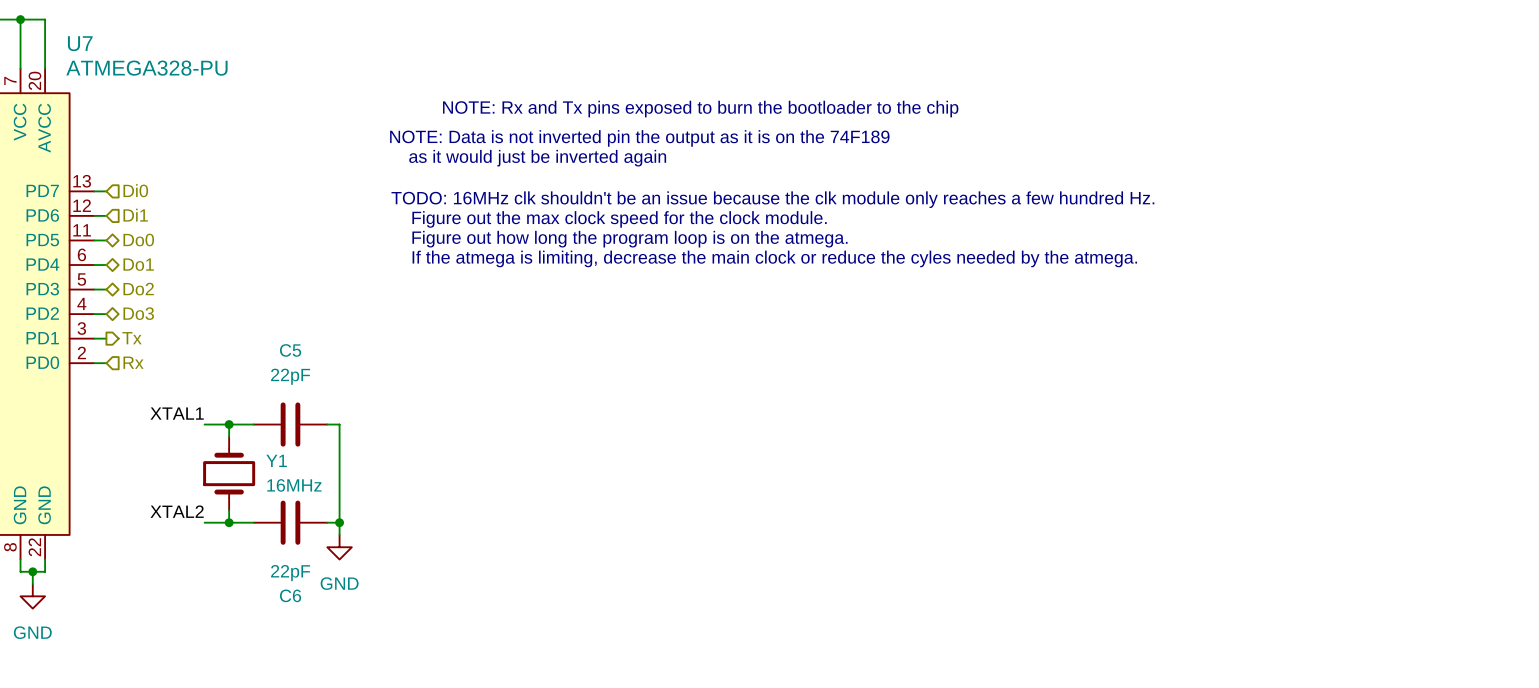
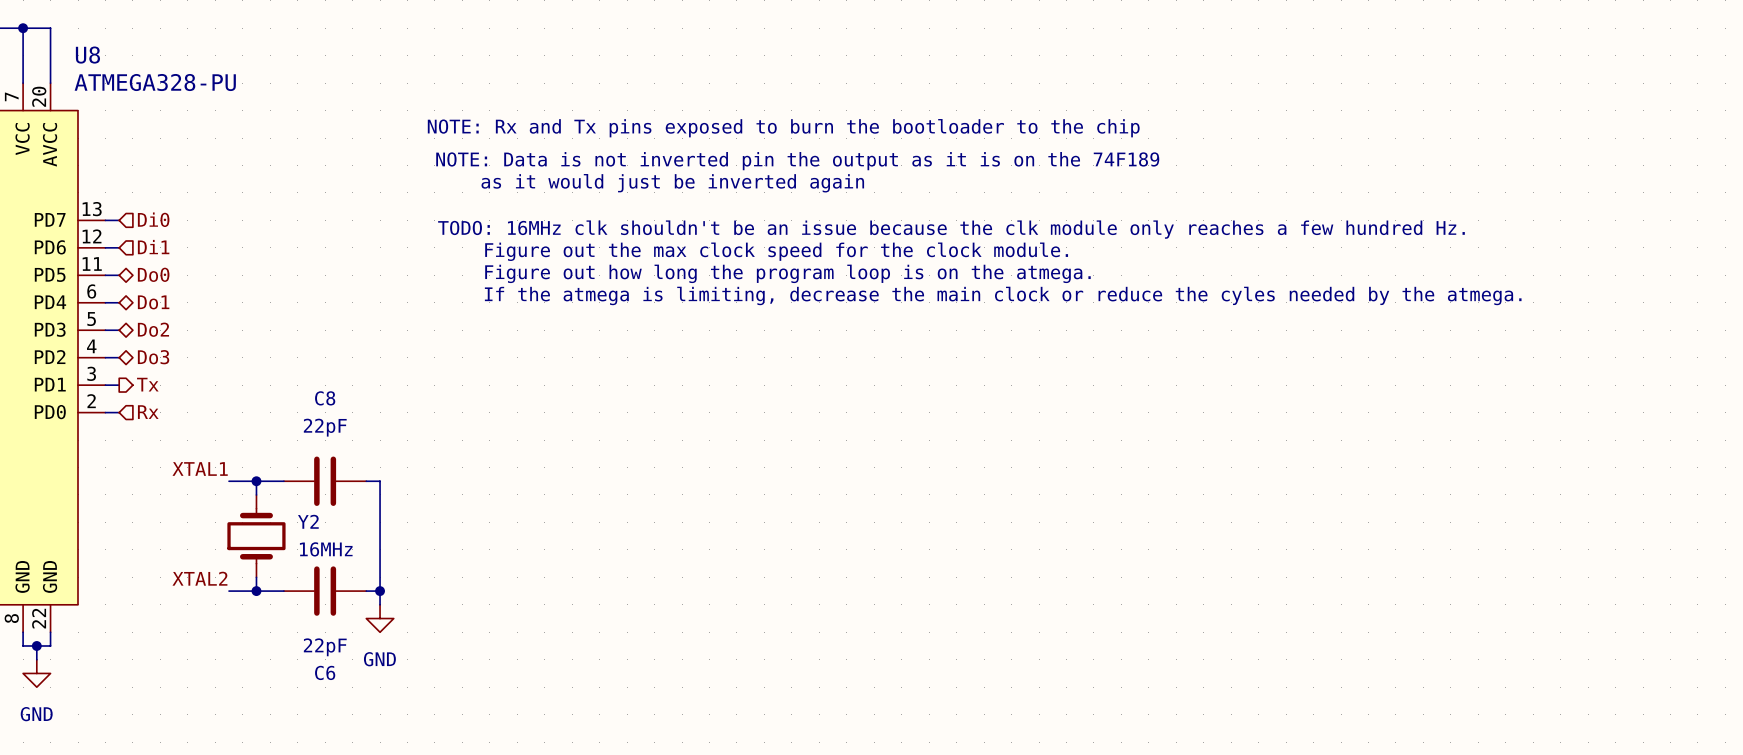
U7 name: U7 (80, 43) -> U8 (87, 55)
C5 name: C5 (290, 350) -> C8 (325, 398)
Y1 name: Y1 (276, 460) -> Y2 (308, 521)

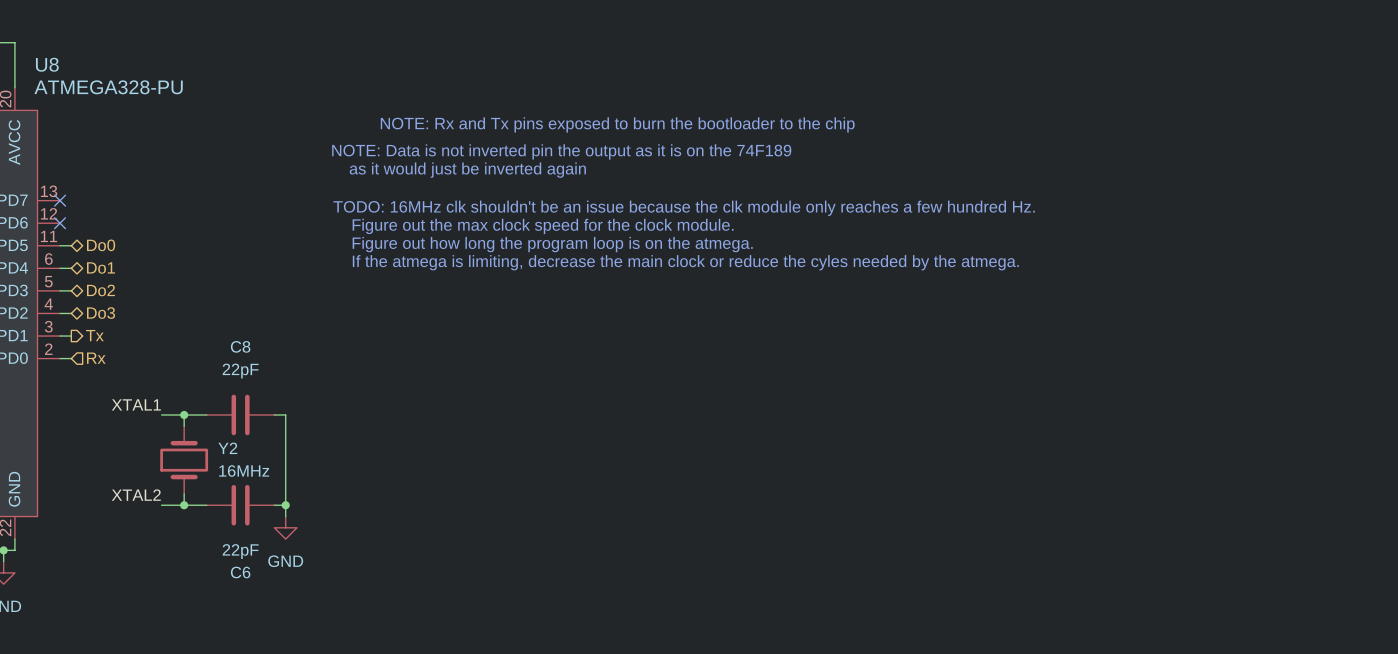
hierarchical label: Di0 (153, 219) -> none
wire: (105, 220) (119, 220) -> none
no-connect mark: none -> (60, 200)
wire: (105, 247) (119, 247) -> none
no-connect mark: none -> (60, 223)
hierarchical label: Di1 (153, 247) -> none

